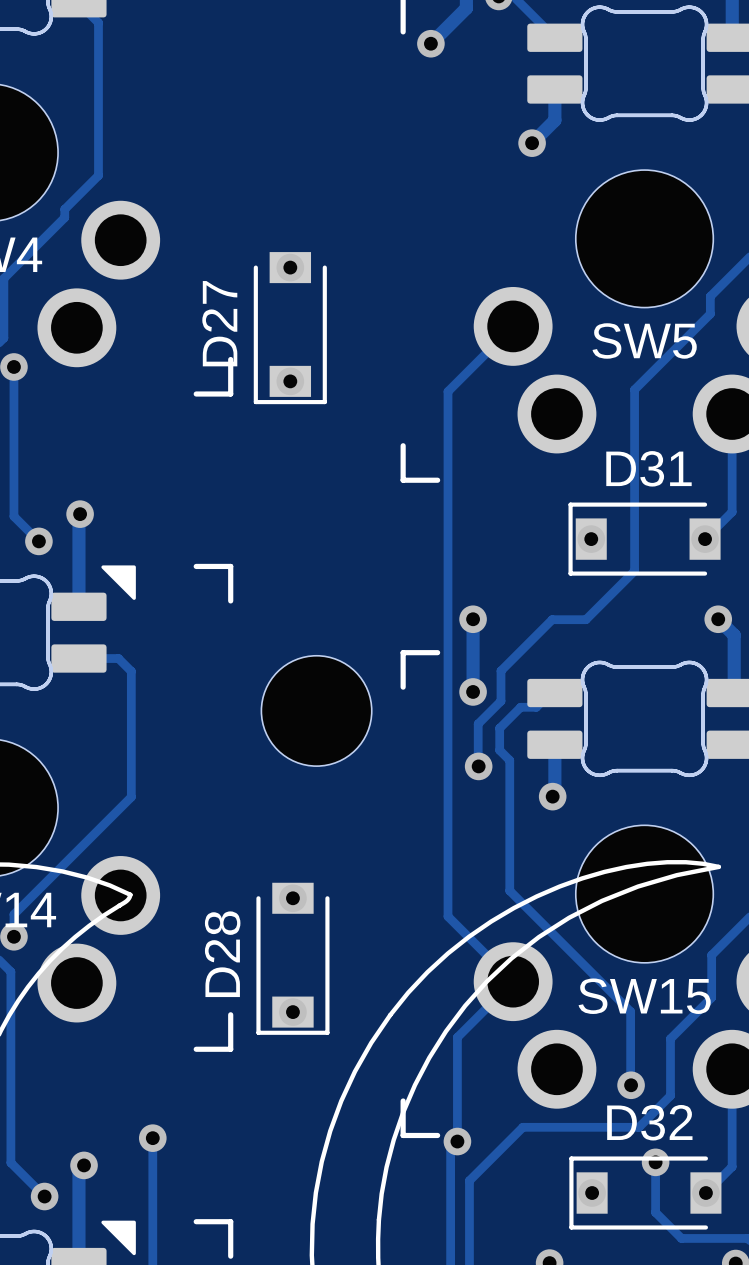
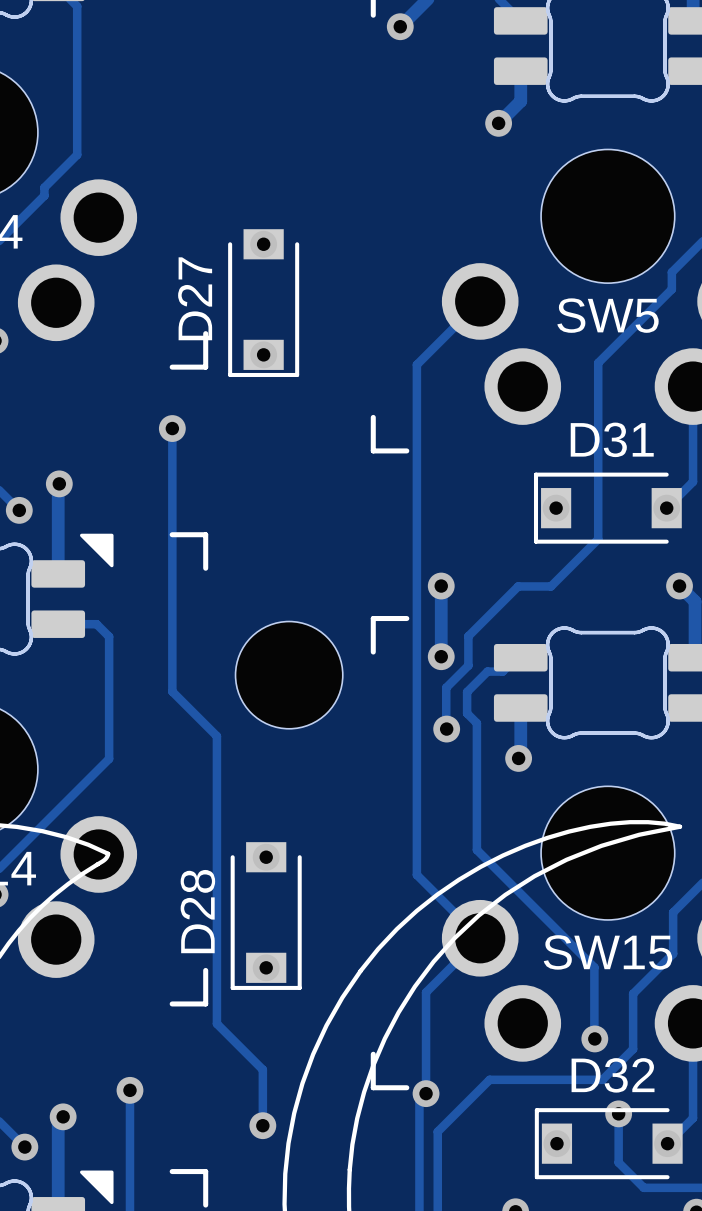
track: none -> (172, 428) (172, 691) (216, 736) (216, 1023) (262, 1069) (262, 1125)
via: none -> (172, 428)
via: none -> (262, 1125)

